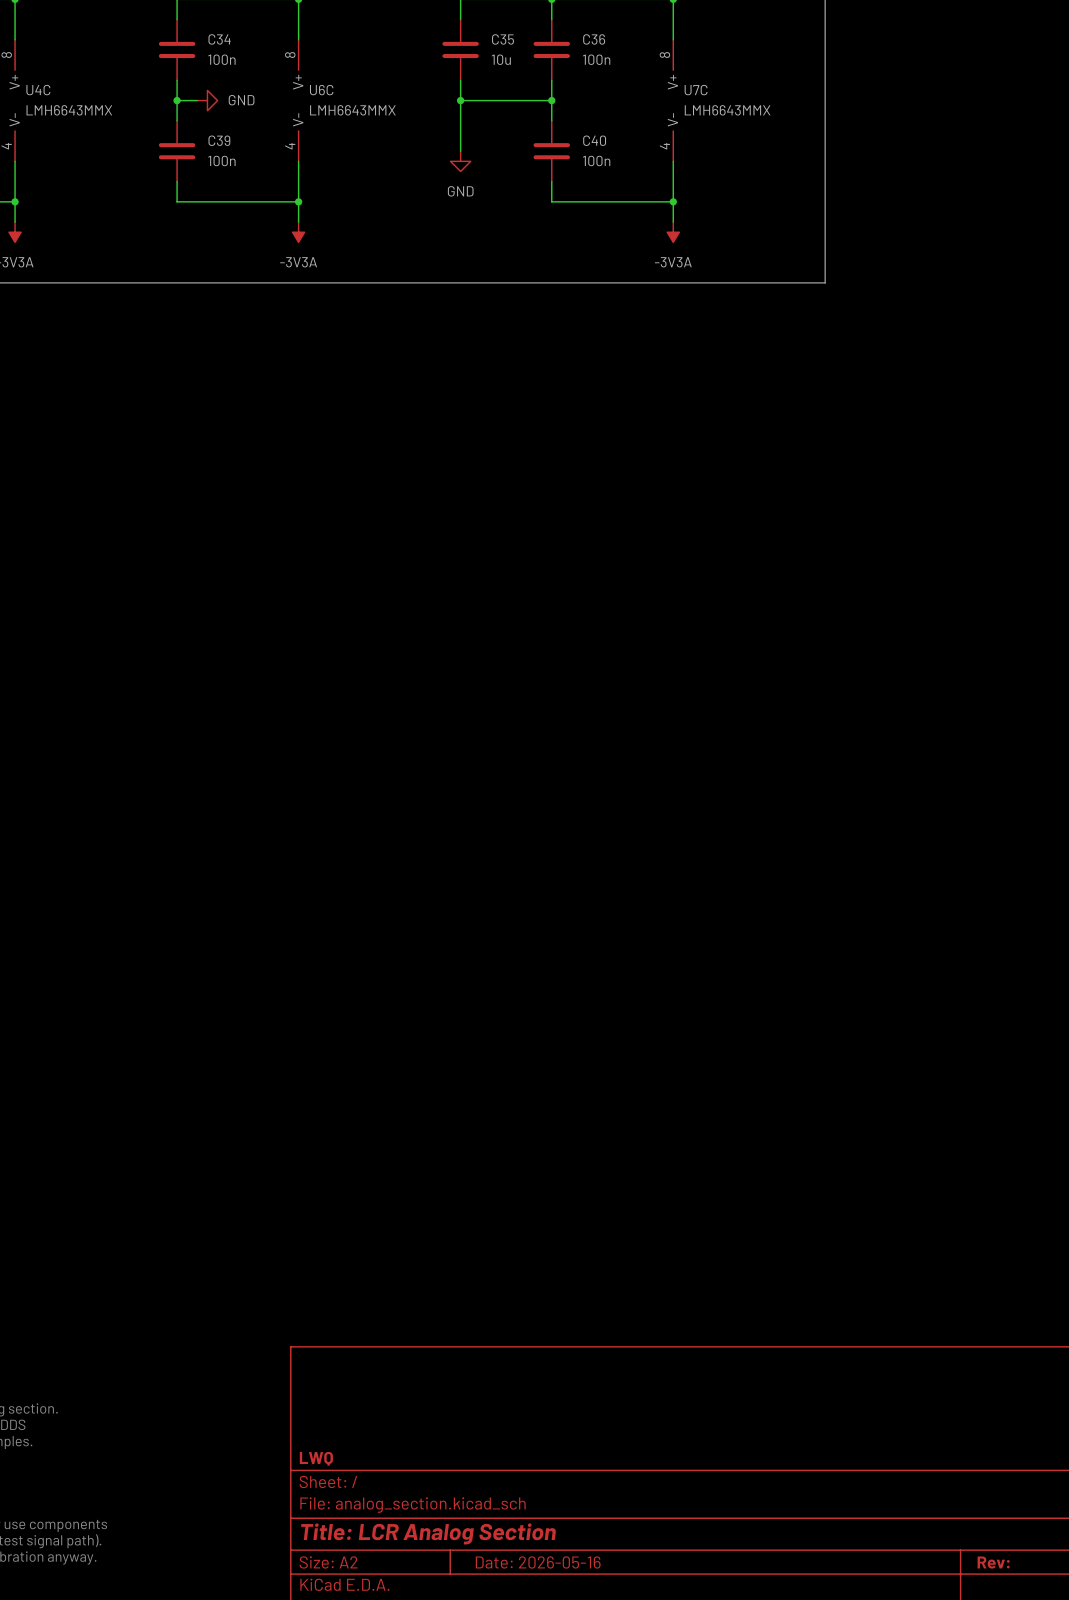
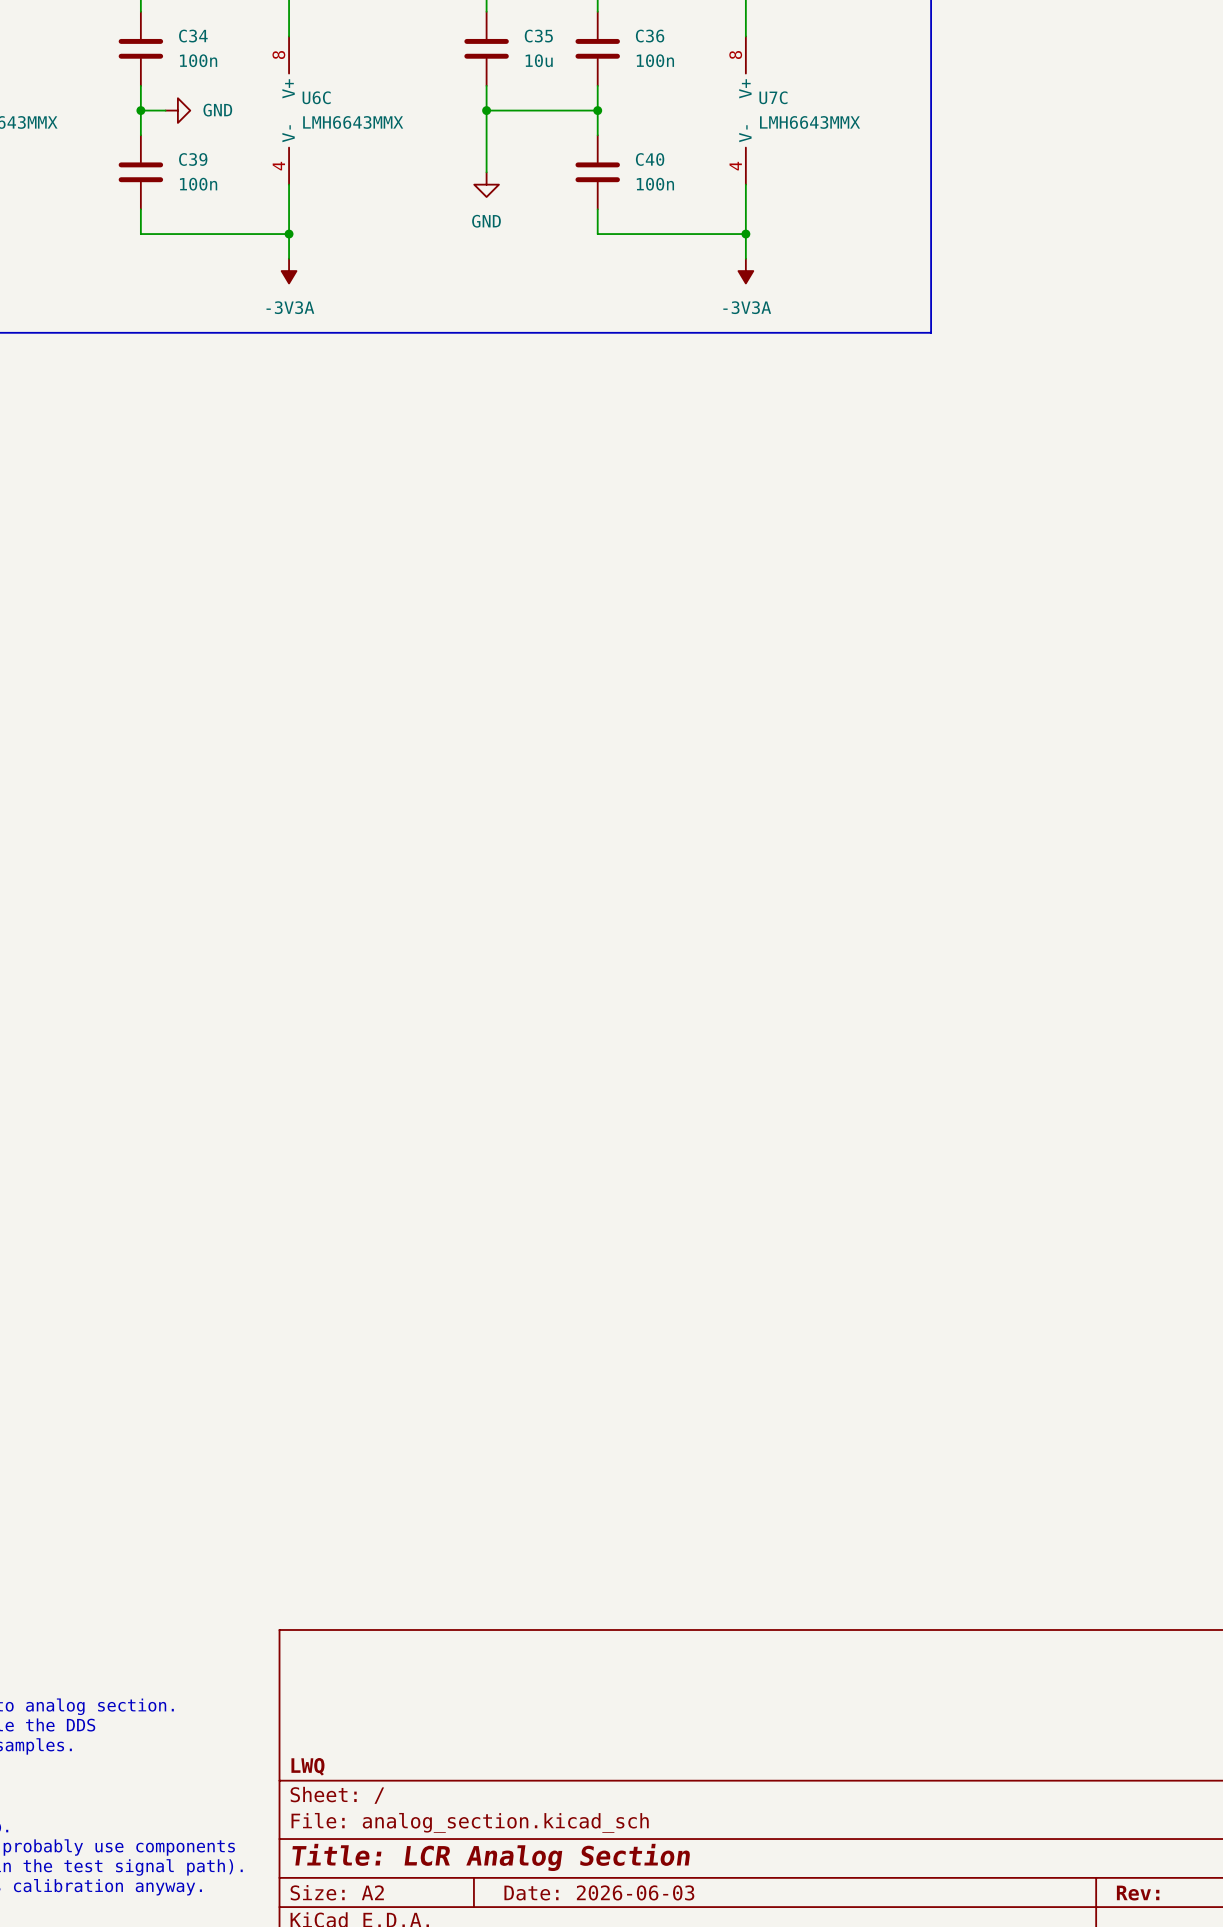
title block: Date: 2026-05-16 (538, 1562) -> Date: 2026-06-03 (599, 1892)

